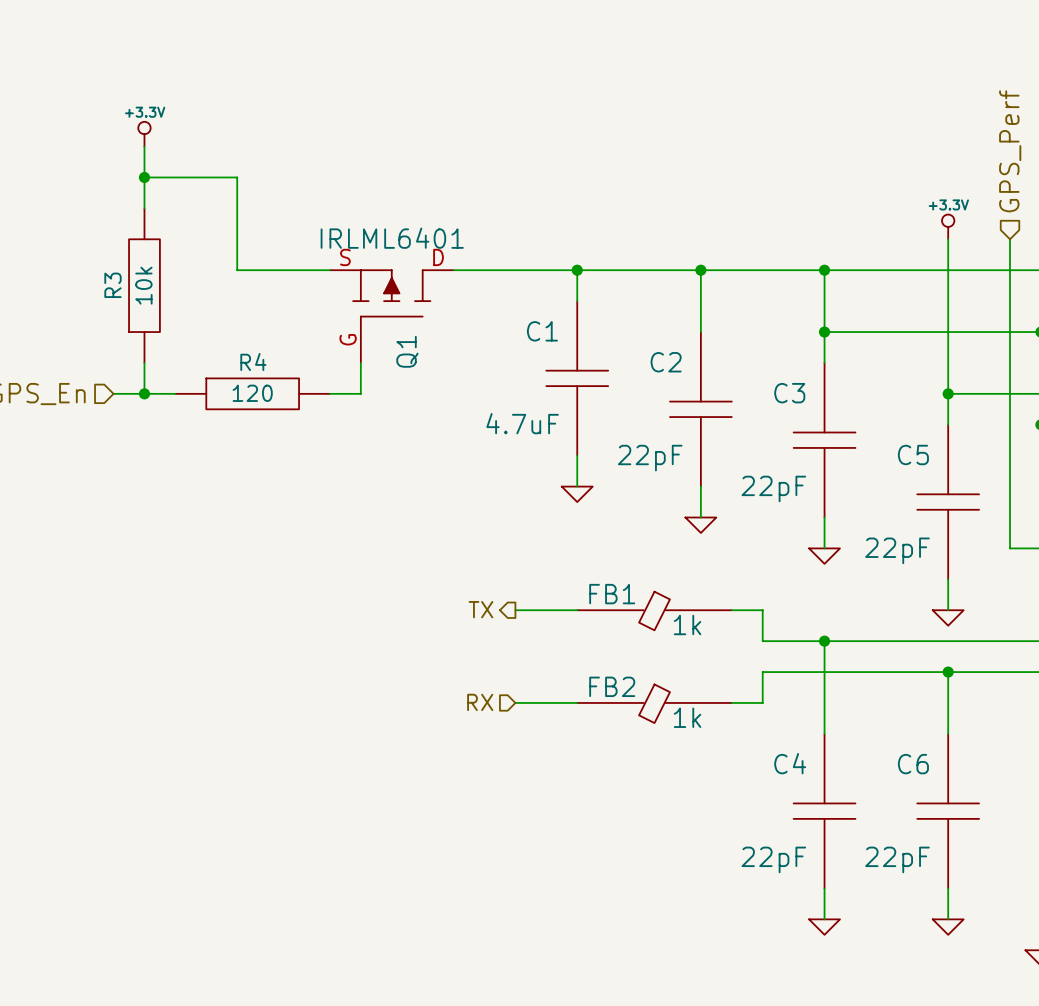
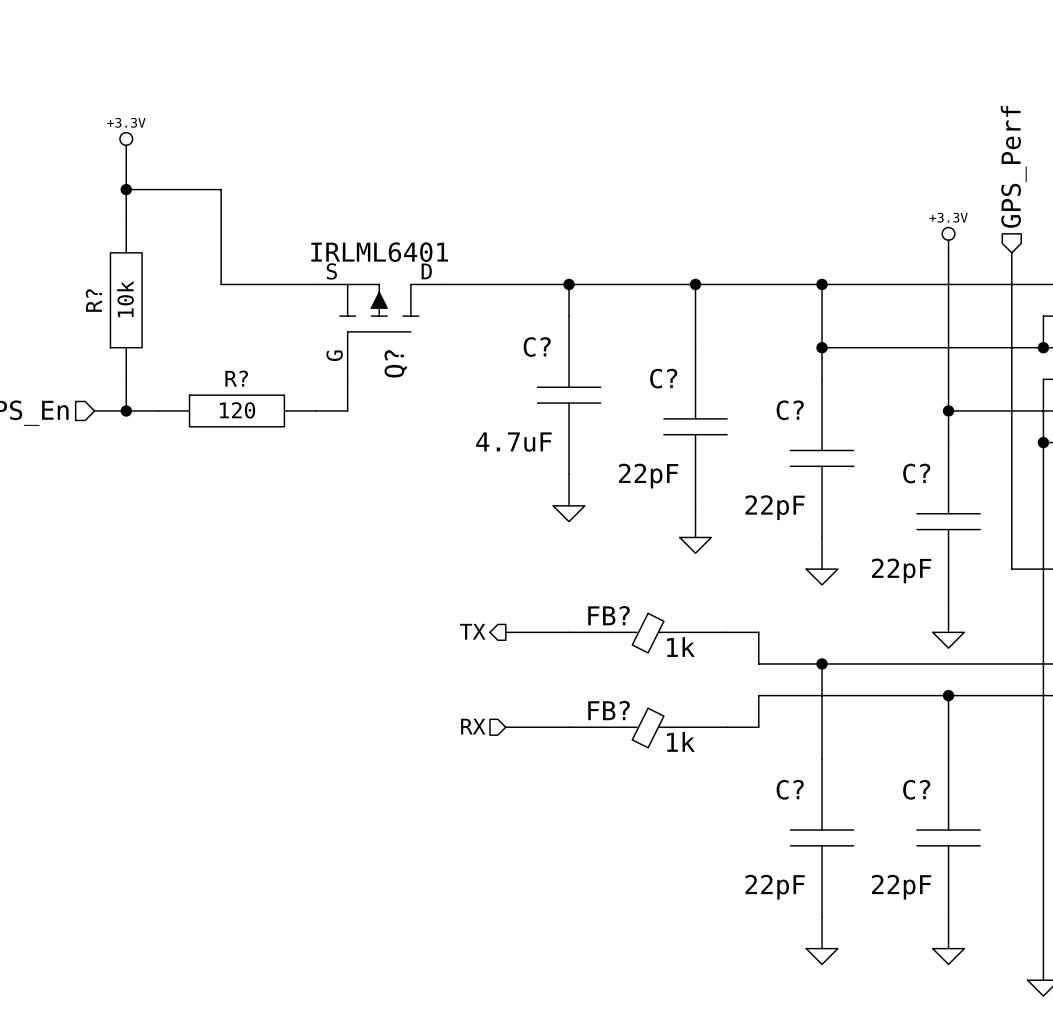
R3 name: R3 (112, 285) -> R? (93, 300)
C1 name: C1 (542, 331) -> C? (537, 347)
Q1 name: Q1 (407, 351) -> Q? (395, 363)
R4 name: R4 (253, 362) -> R? (236, 378)
C2 name: C2 (666, 362) -> C? (663, 378)
C3 name: C3 (789, 393) -> C? (790, 410)
C5 name: C5 (913, 454) -> C? (916, 473)
FB1 name: FB1 (612, 594) -> FB? (609, 615)
FB2 name: FB2 (612, 686) -> FB? (609, 710)
C4 name: C4 (790, 763) -> C? (790, 789)
C6 name: C6 (913, 764) -> C? (916, 789)

